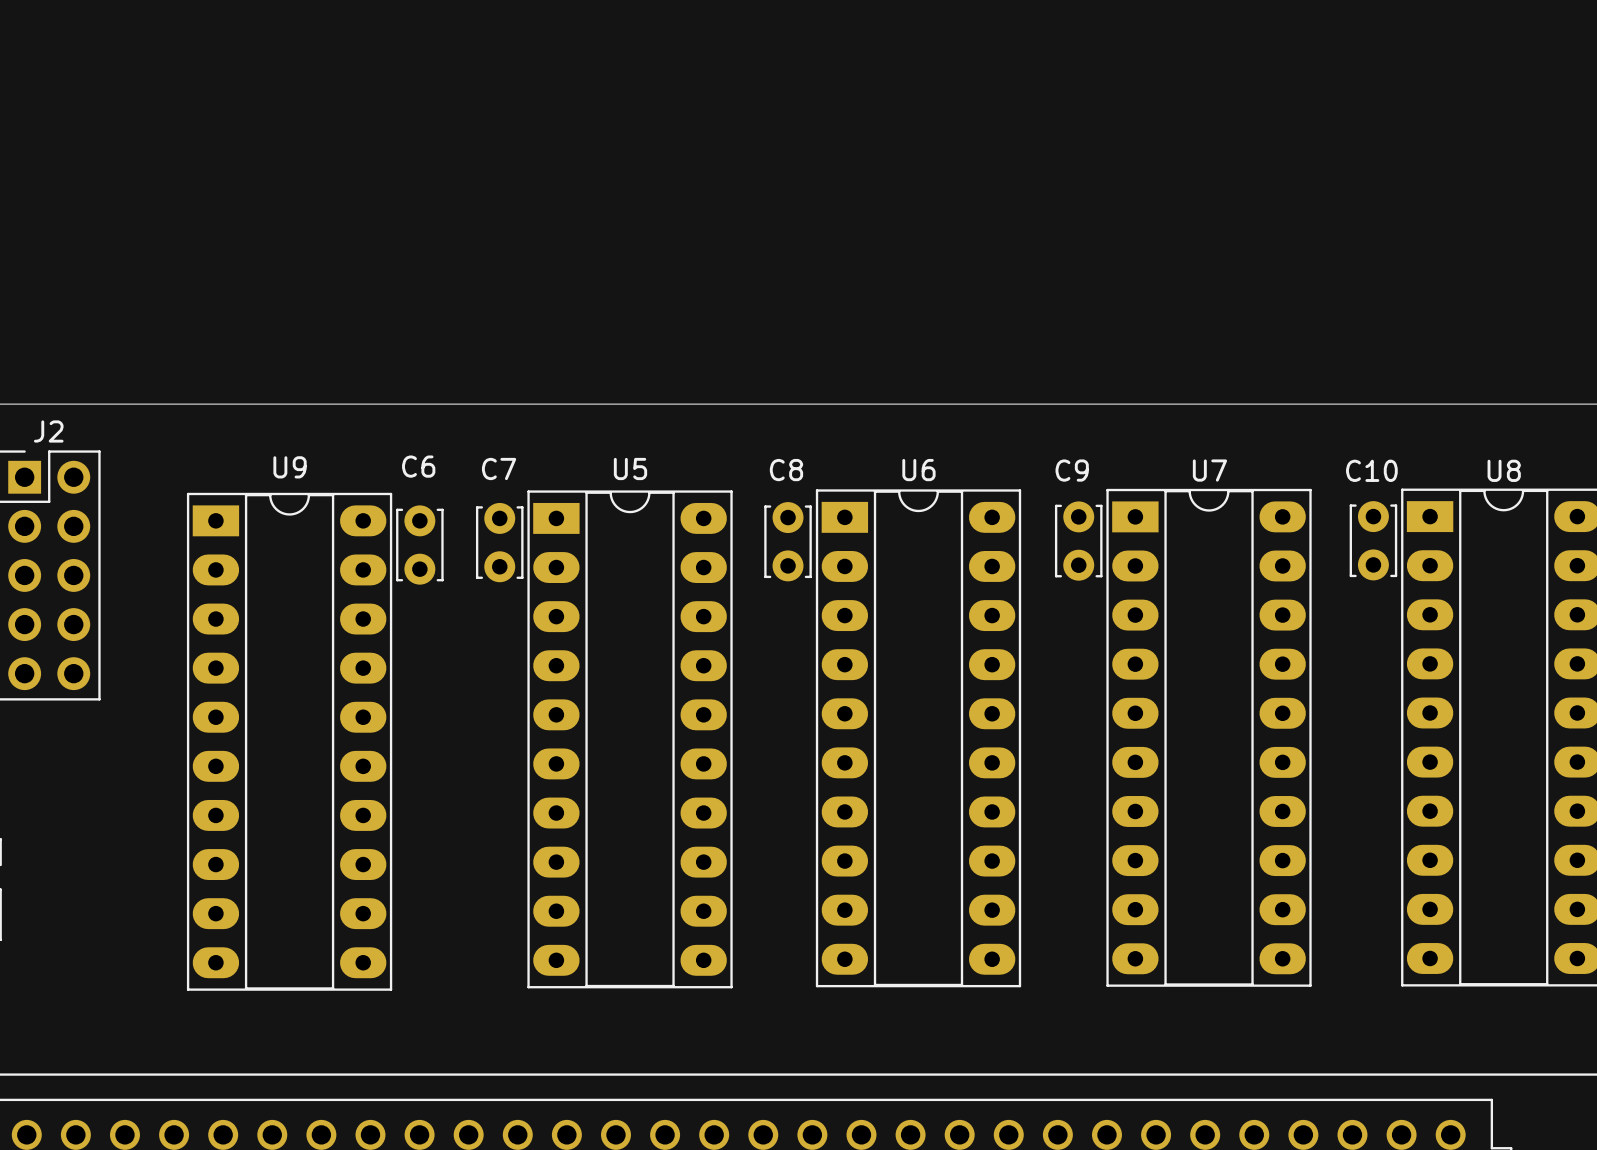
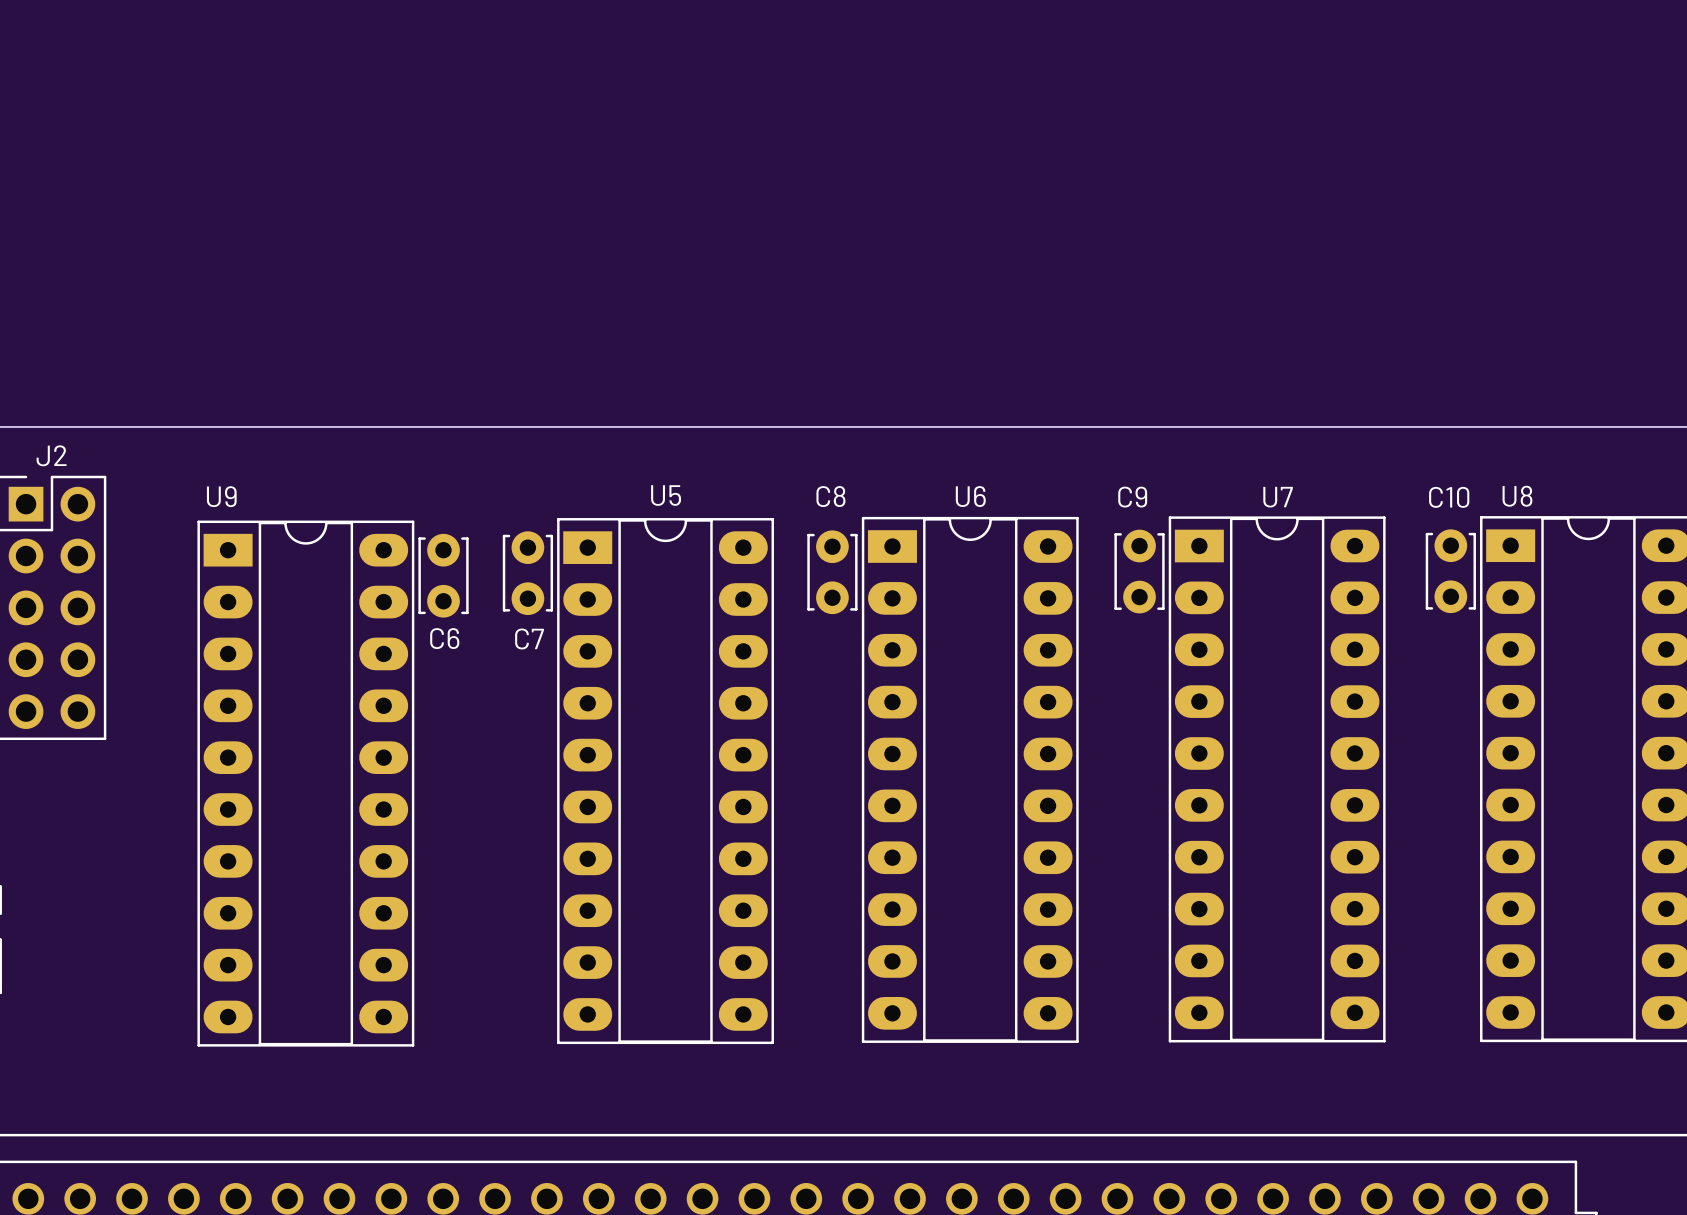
C6 name position: C6 (418, 466) -> C6 (444, 638)
U9 name position: U9 (290, 467) -> U9 (221, 496)
C7 name position: C7 (499, 468) -> C7 (529, 638)
U8 name position: U8 (1504, 470) -> U8 (1517, 496)

